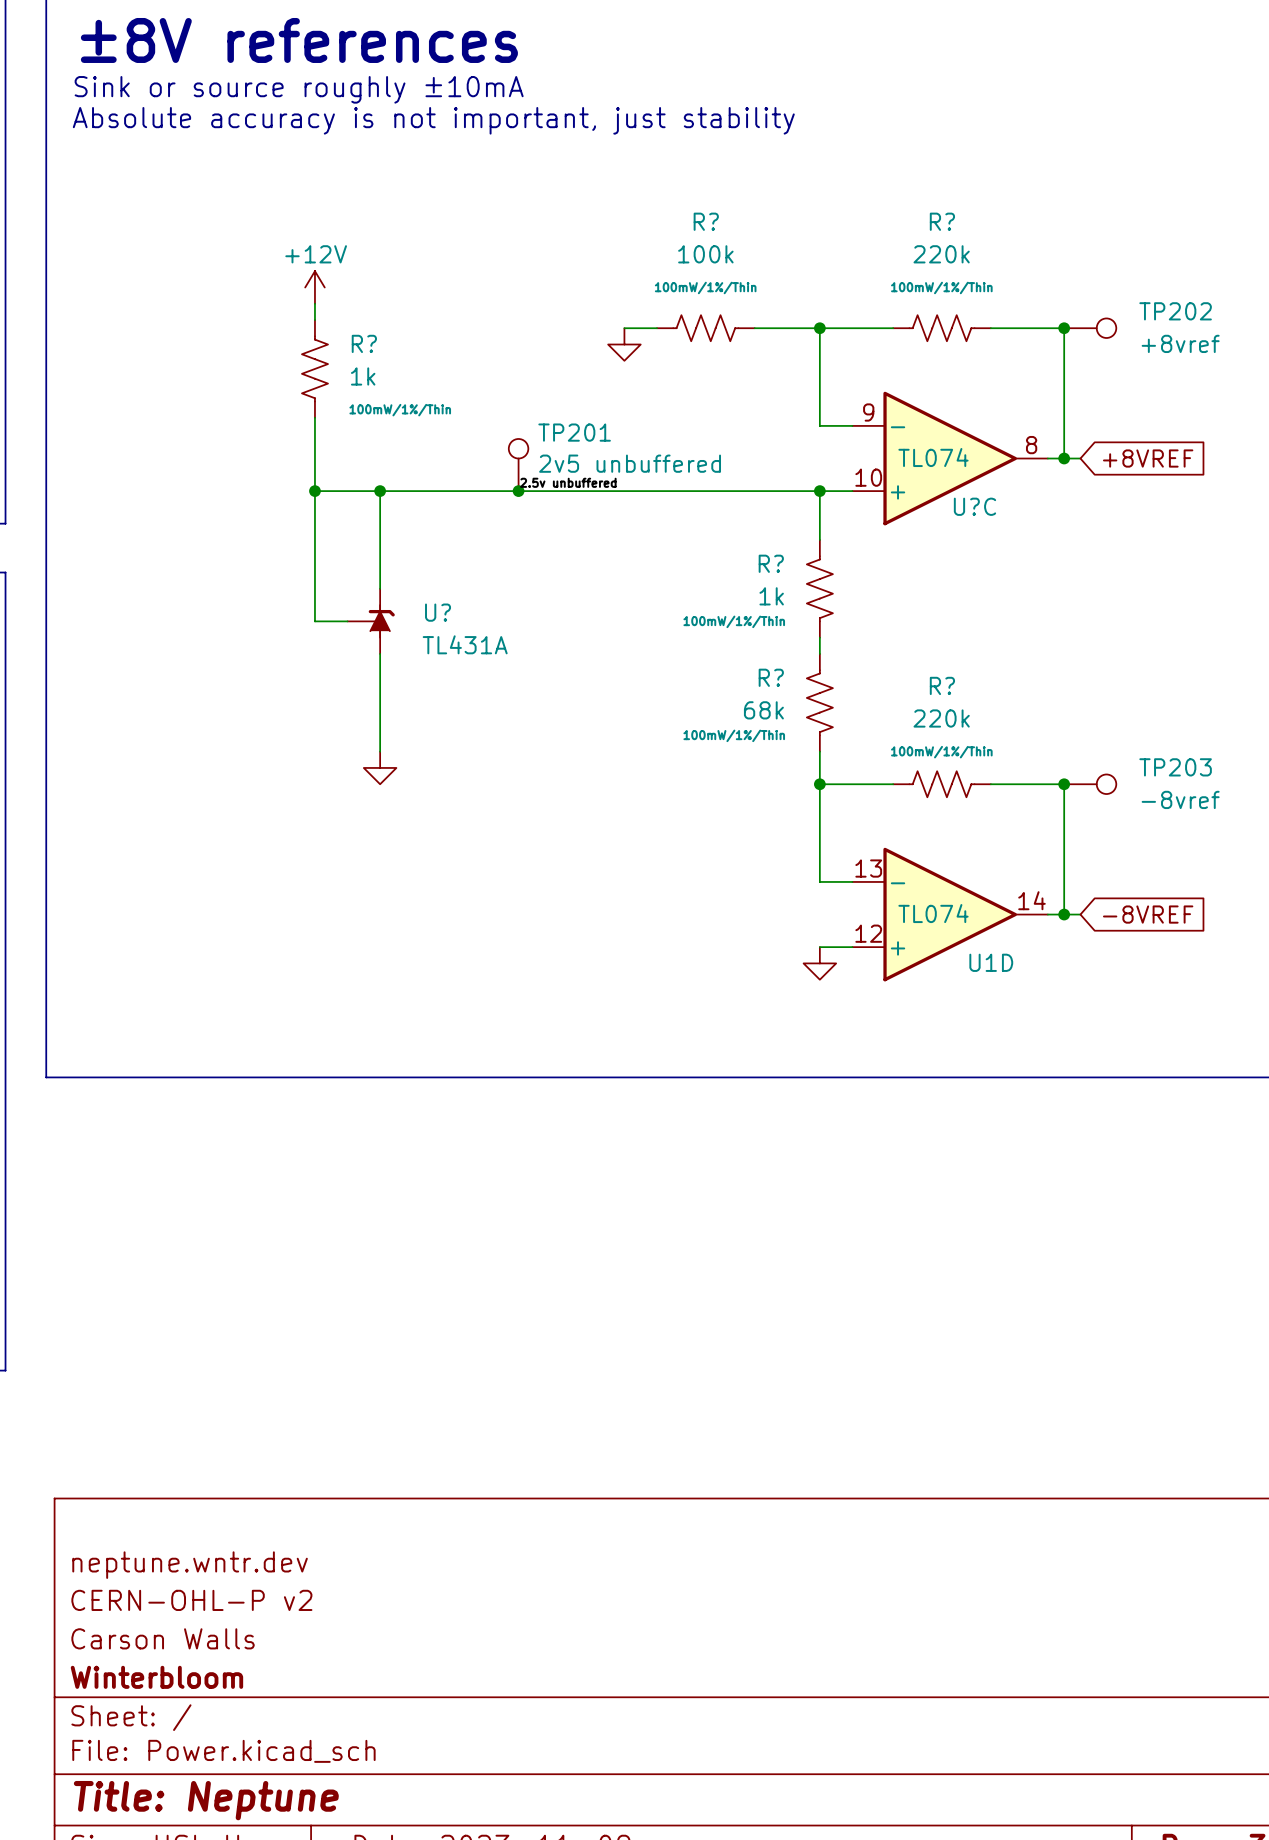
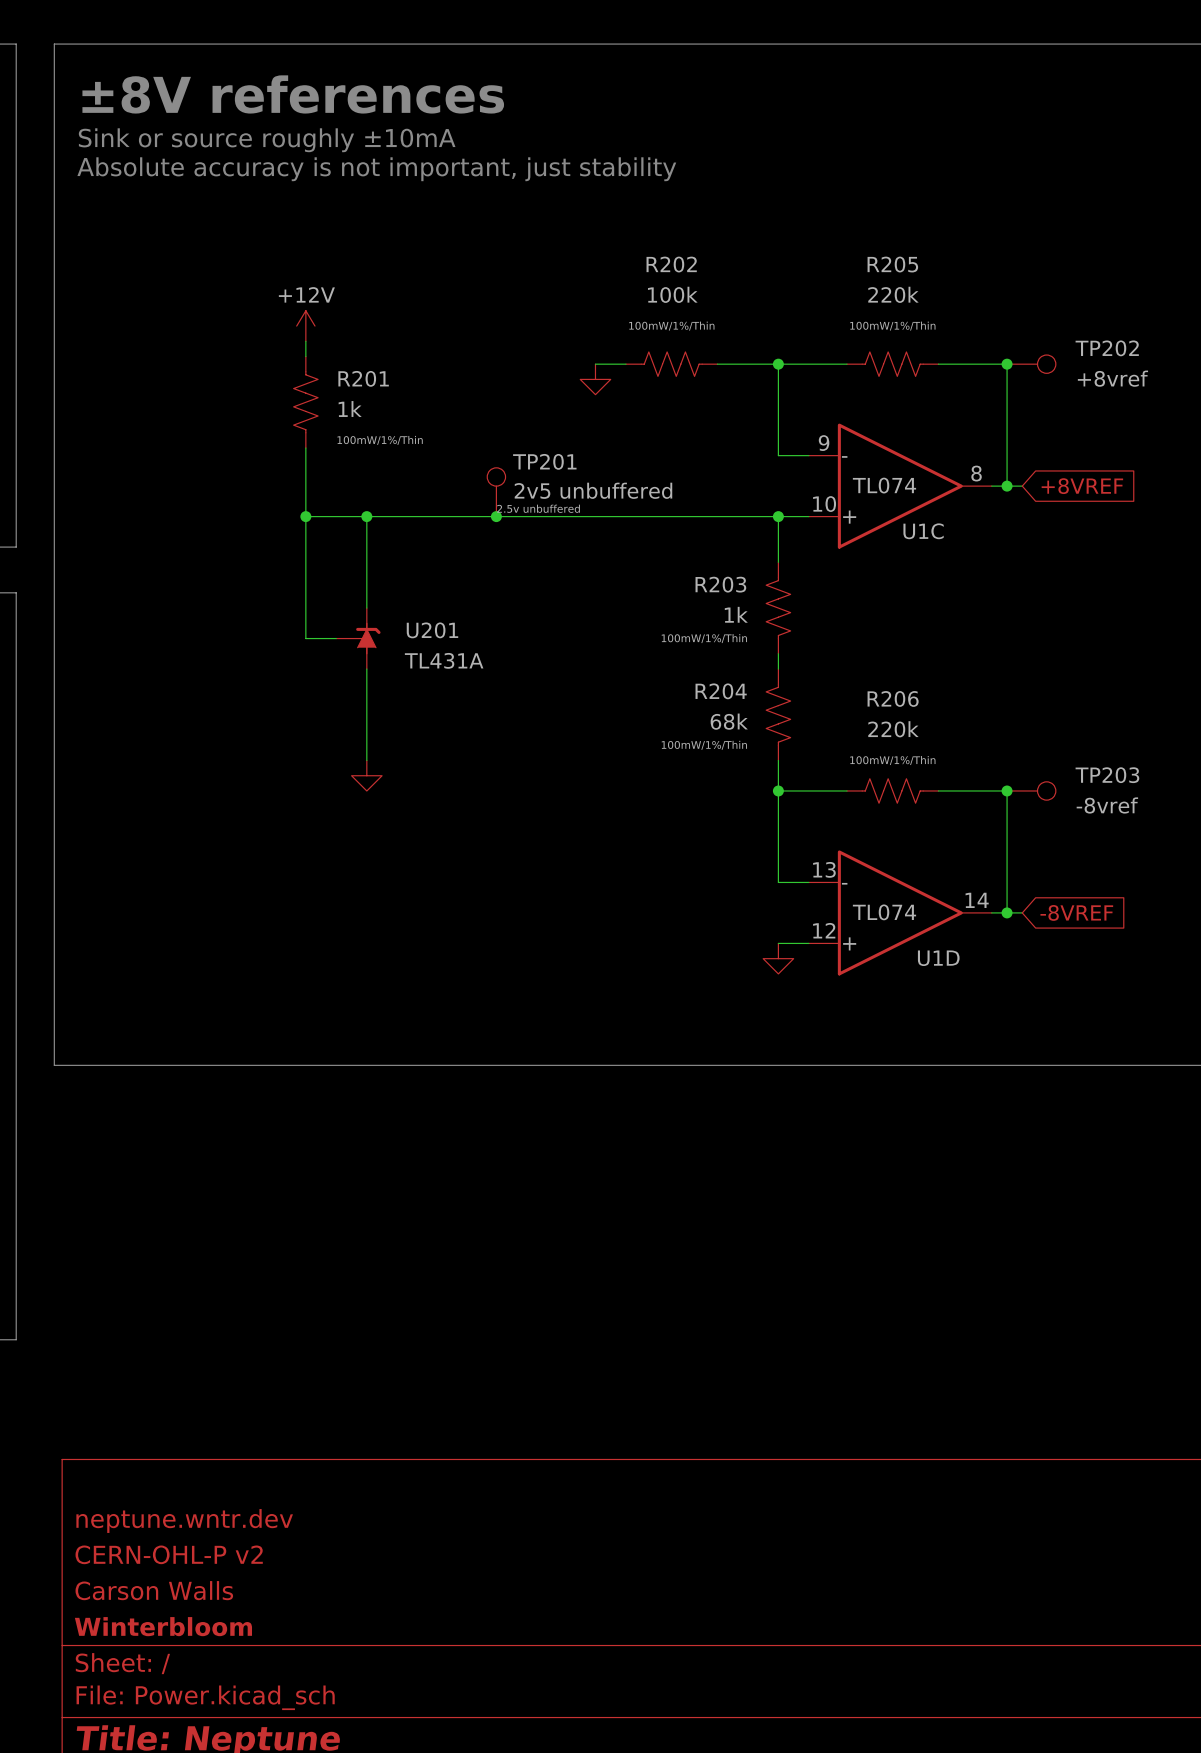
R? name: R? (706, 221) -> R202 (671, 264)
R? name: R? (942, 221) -> R205 (892, 264)
R? name: R? (364, 343) -> R201 (363, 378)
U?C name: U?C (974, 506) -> U1C (923, 531)
R? name: R? (771, 563) -> R203 (720, 584)
U? name: U? (438, 612) -> U201 (432, 630)
R? name: R? (771, 677) -> R204 (721, 691)
R? name: R? (942, 685) -> R206 (893, 698)

